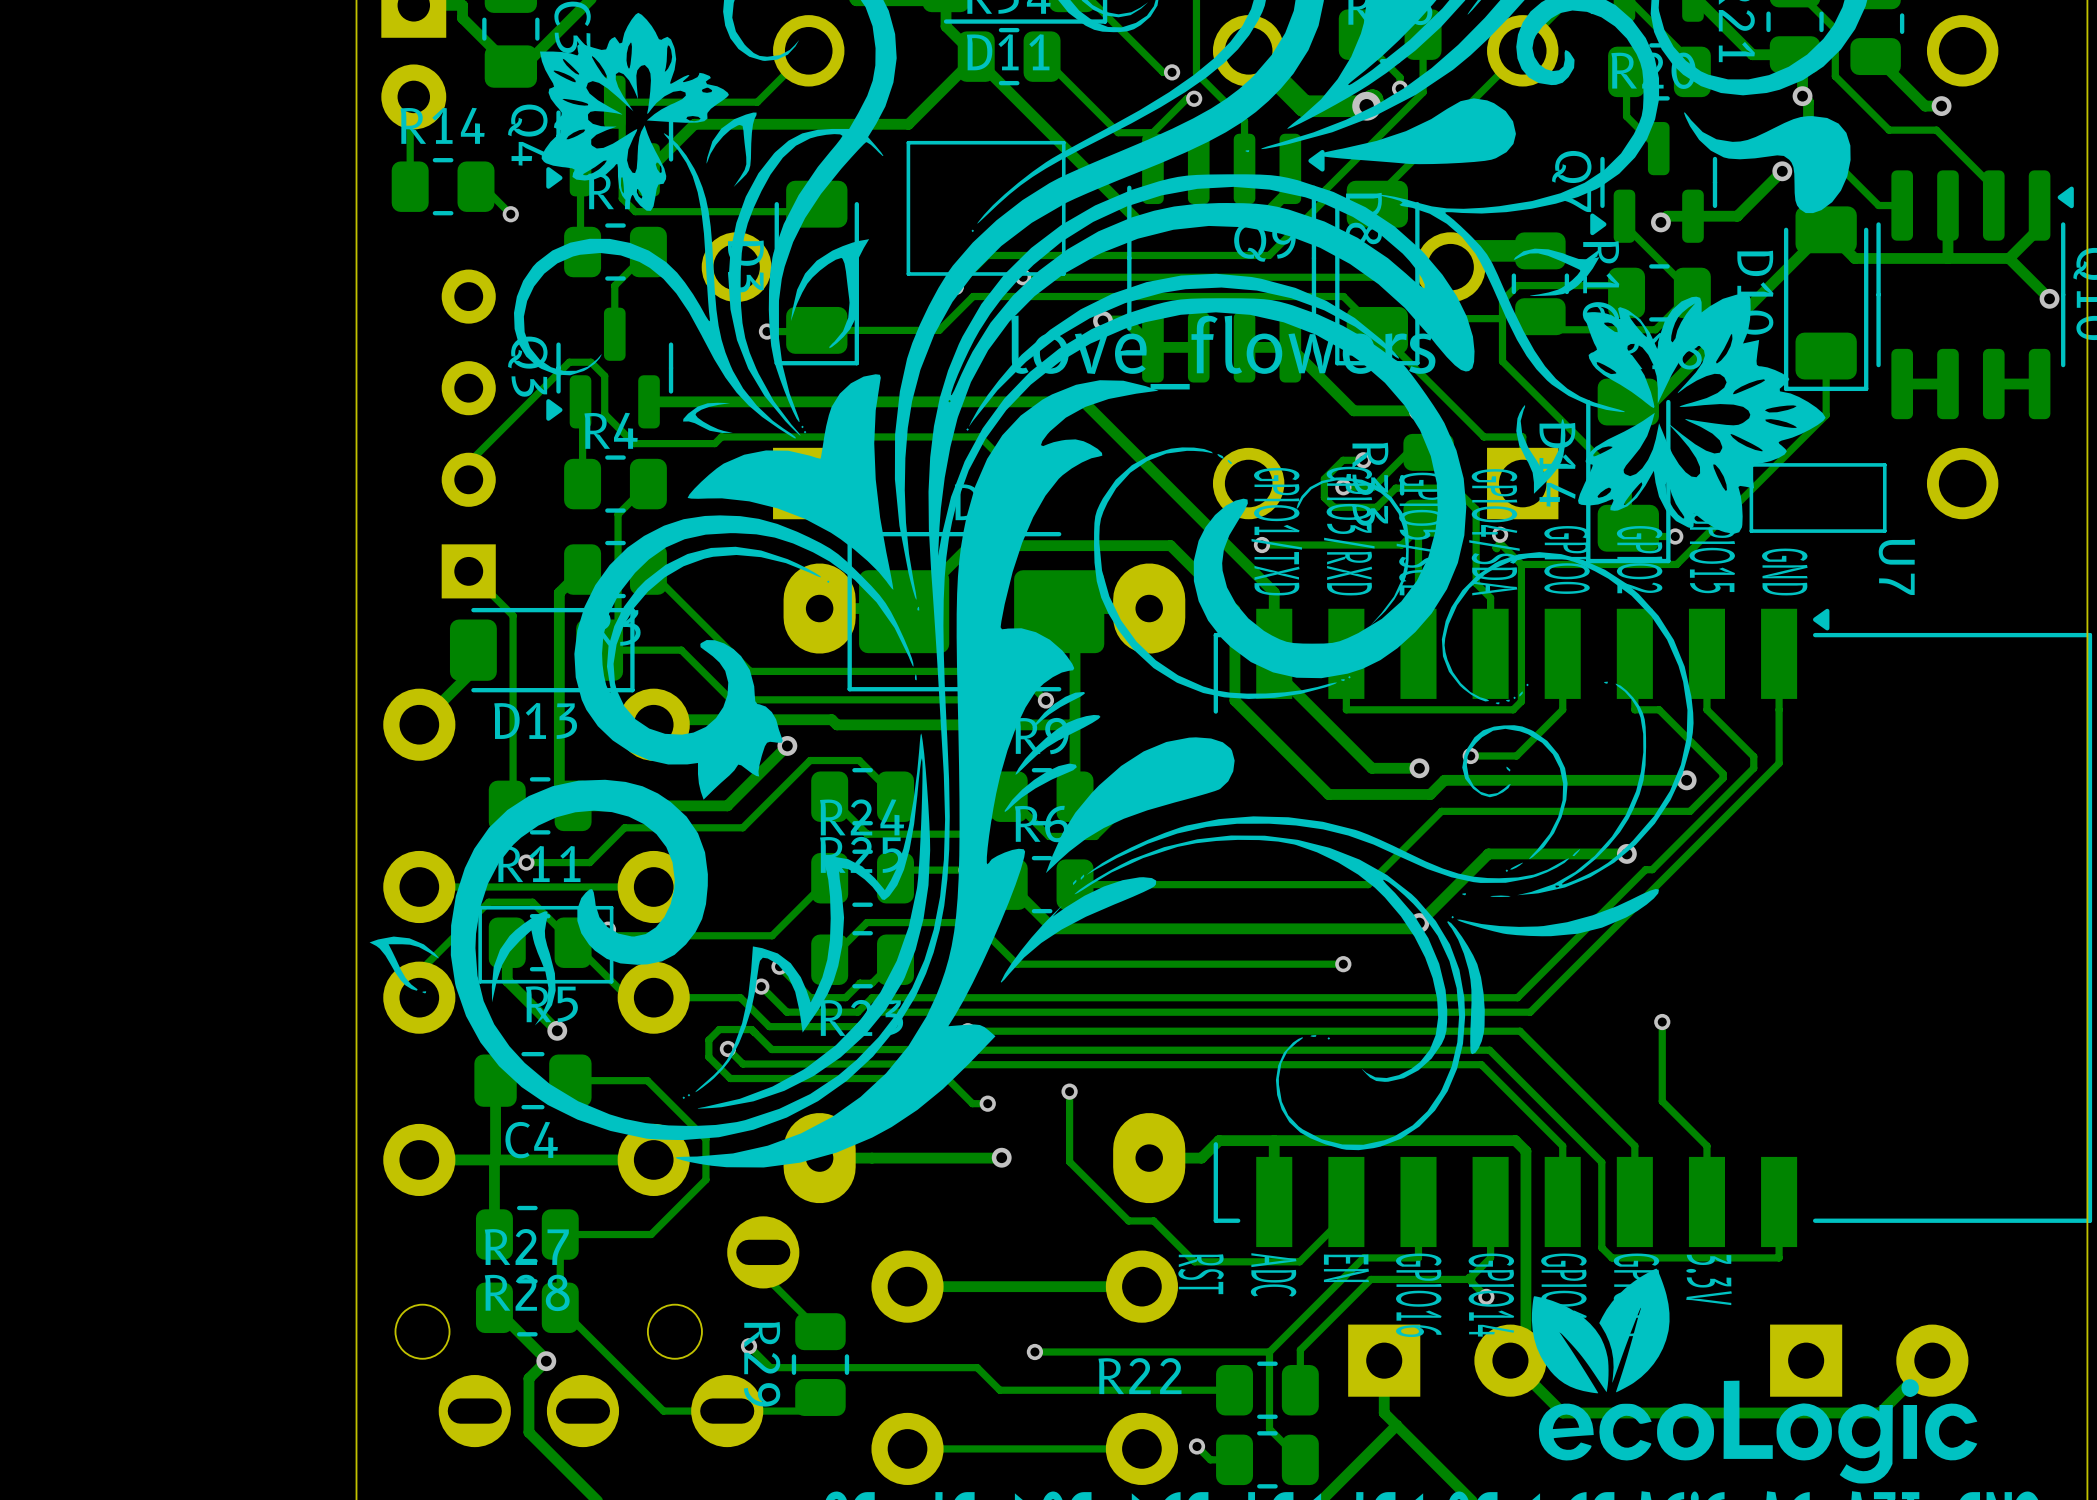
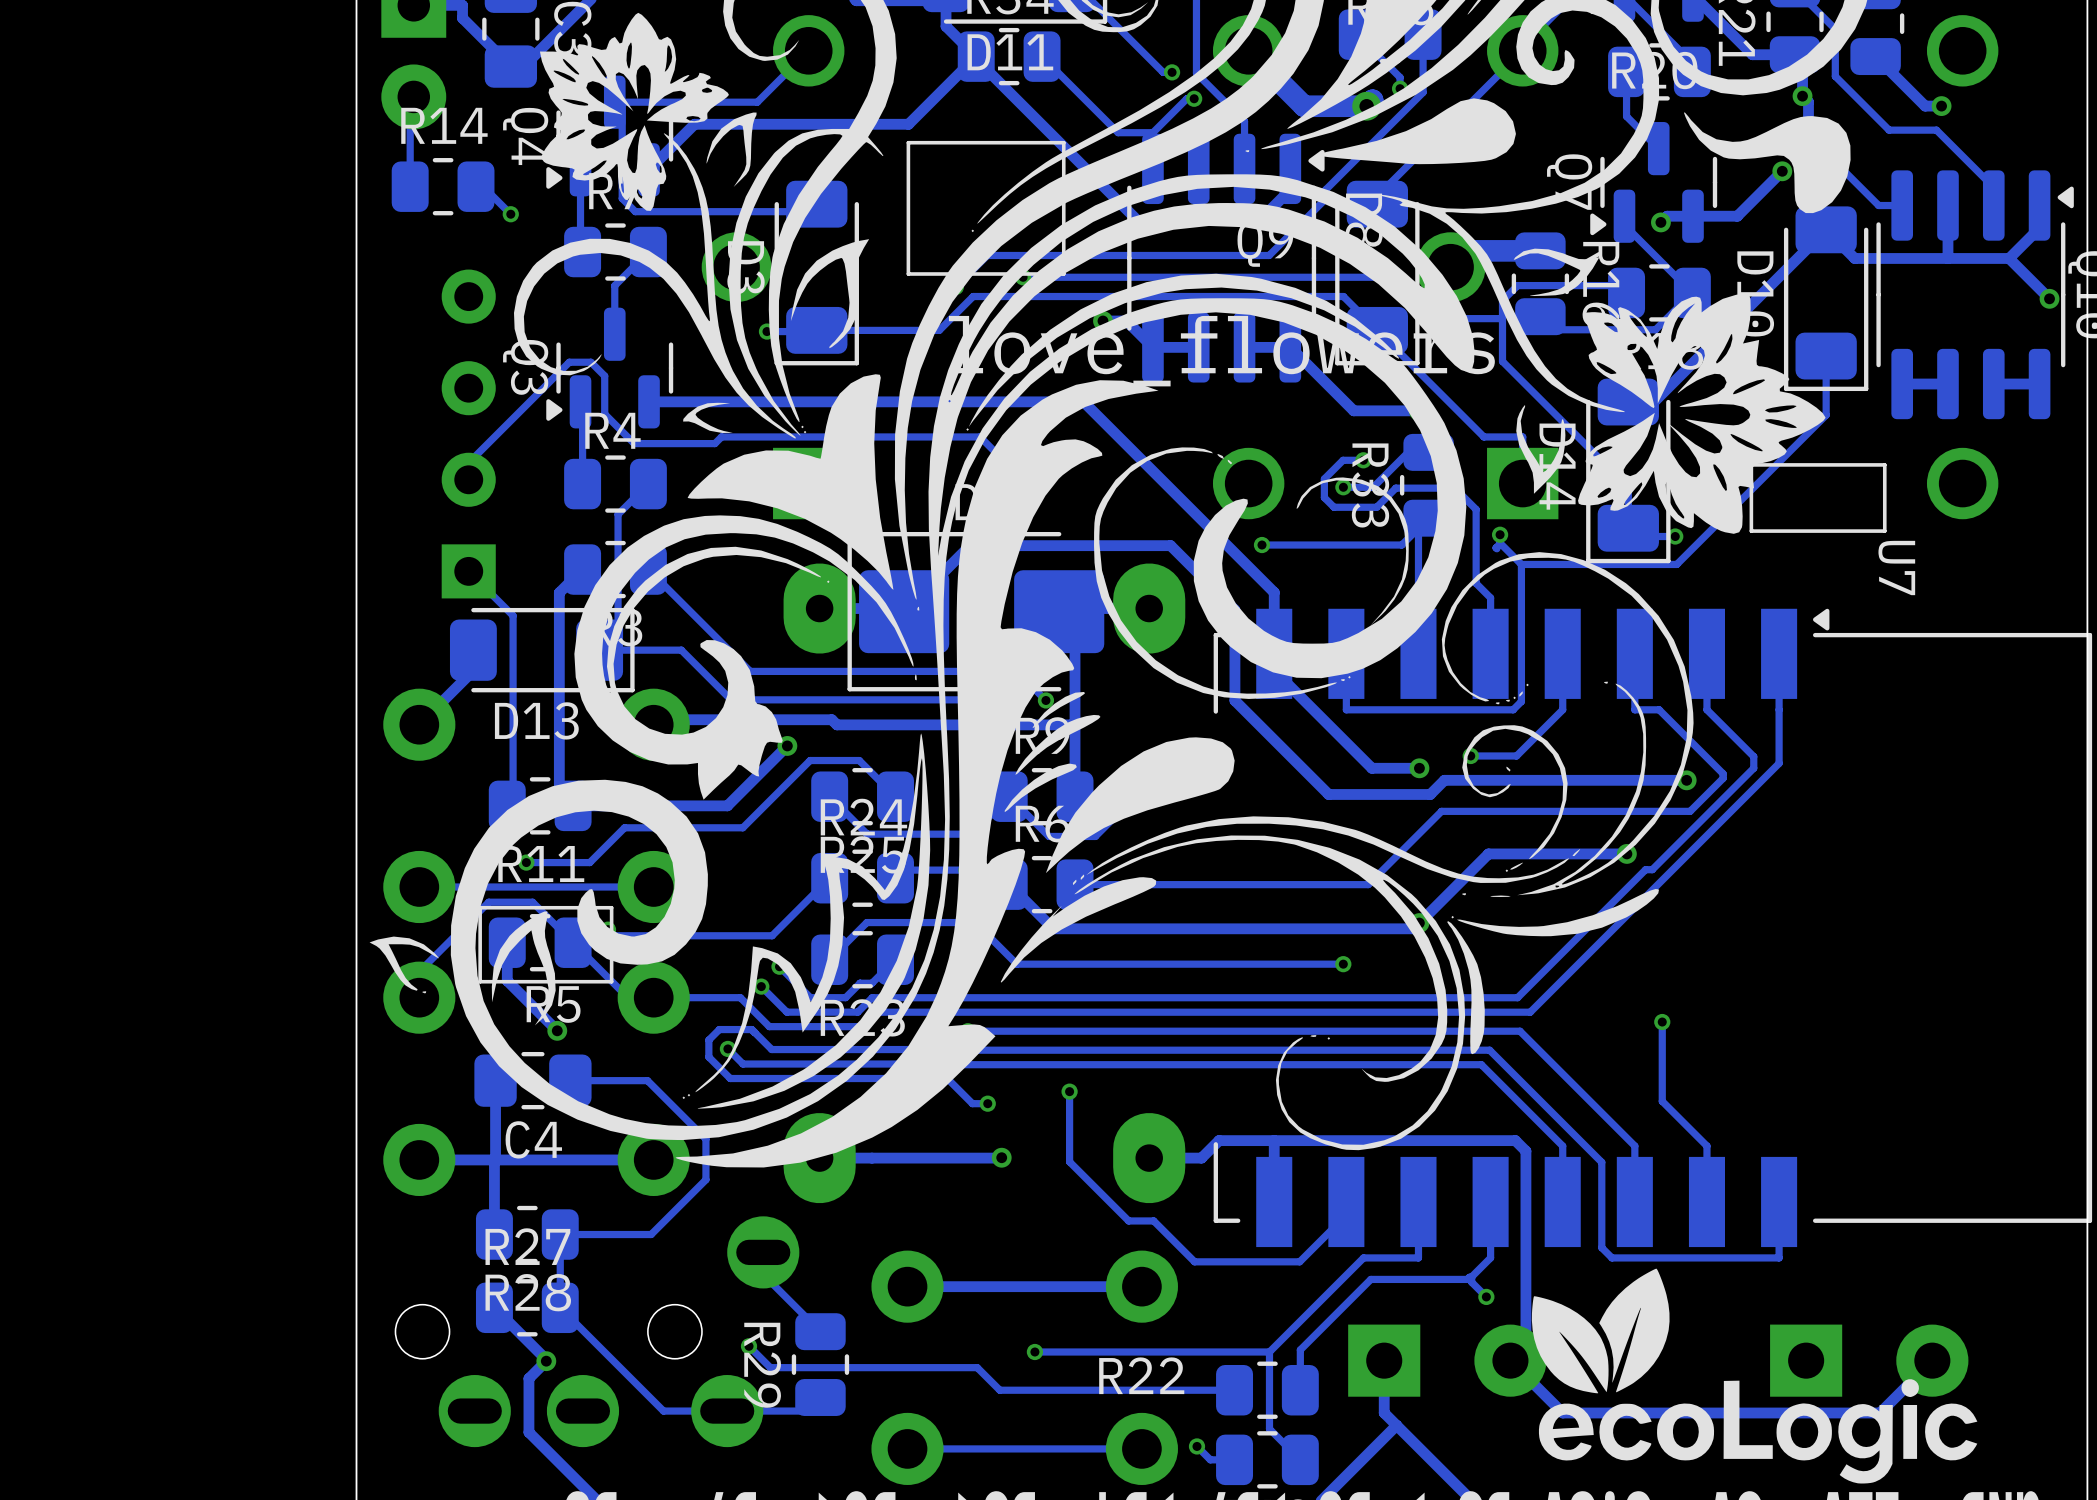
U7 footprint: [1213, 608, 2093, 1248] -> [1213, 608, 2093, 1248]

